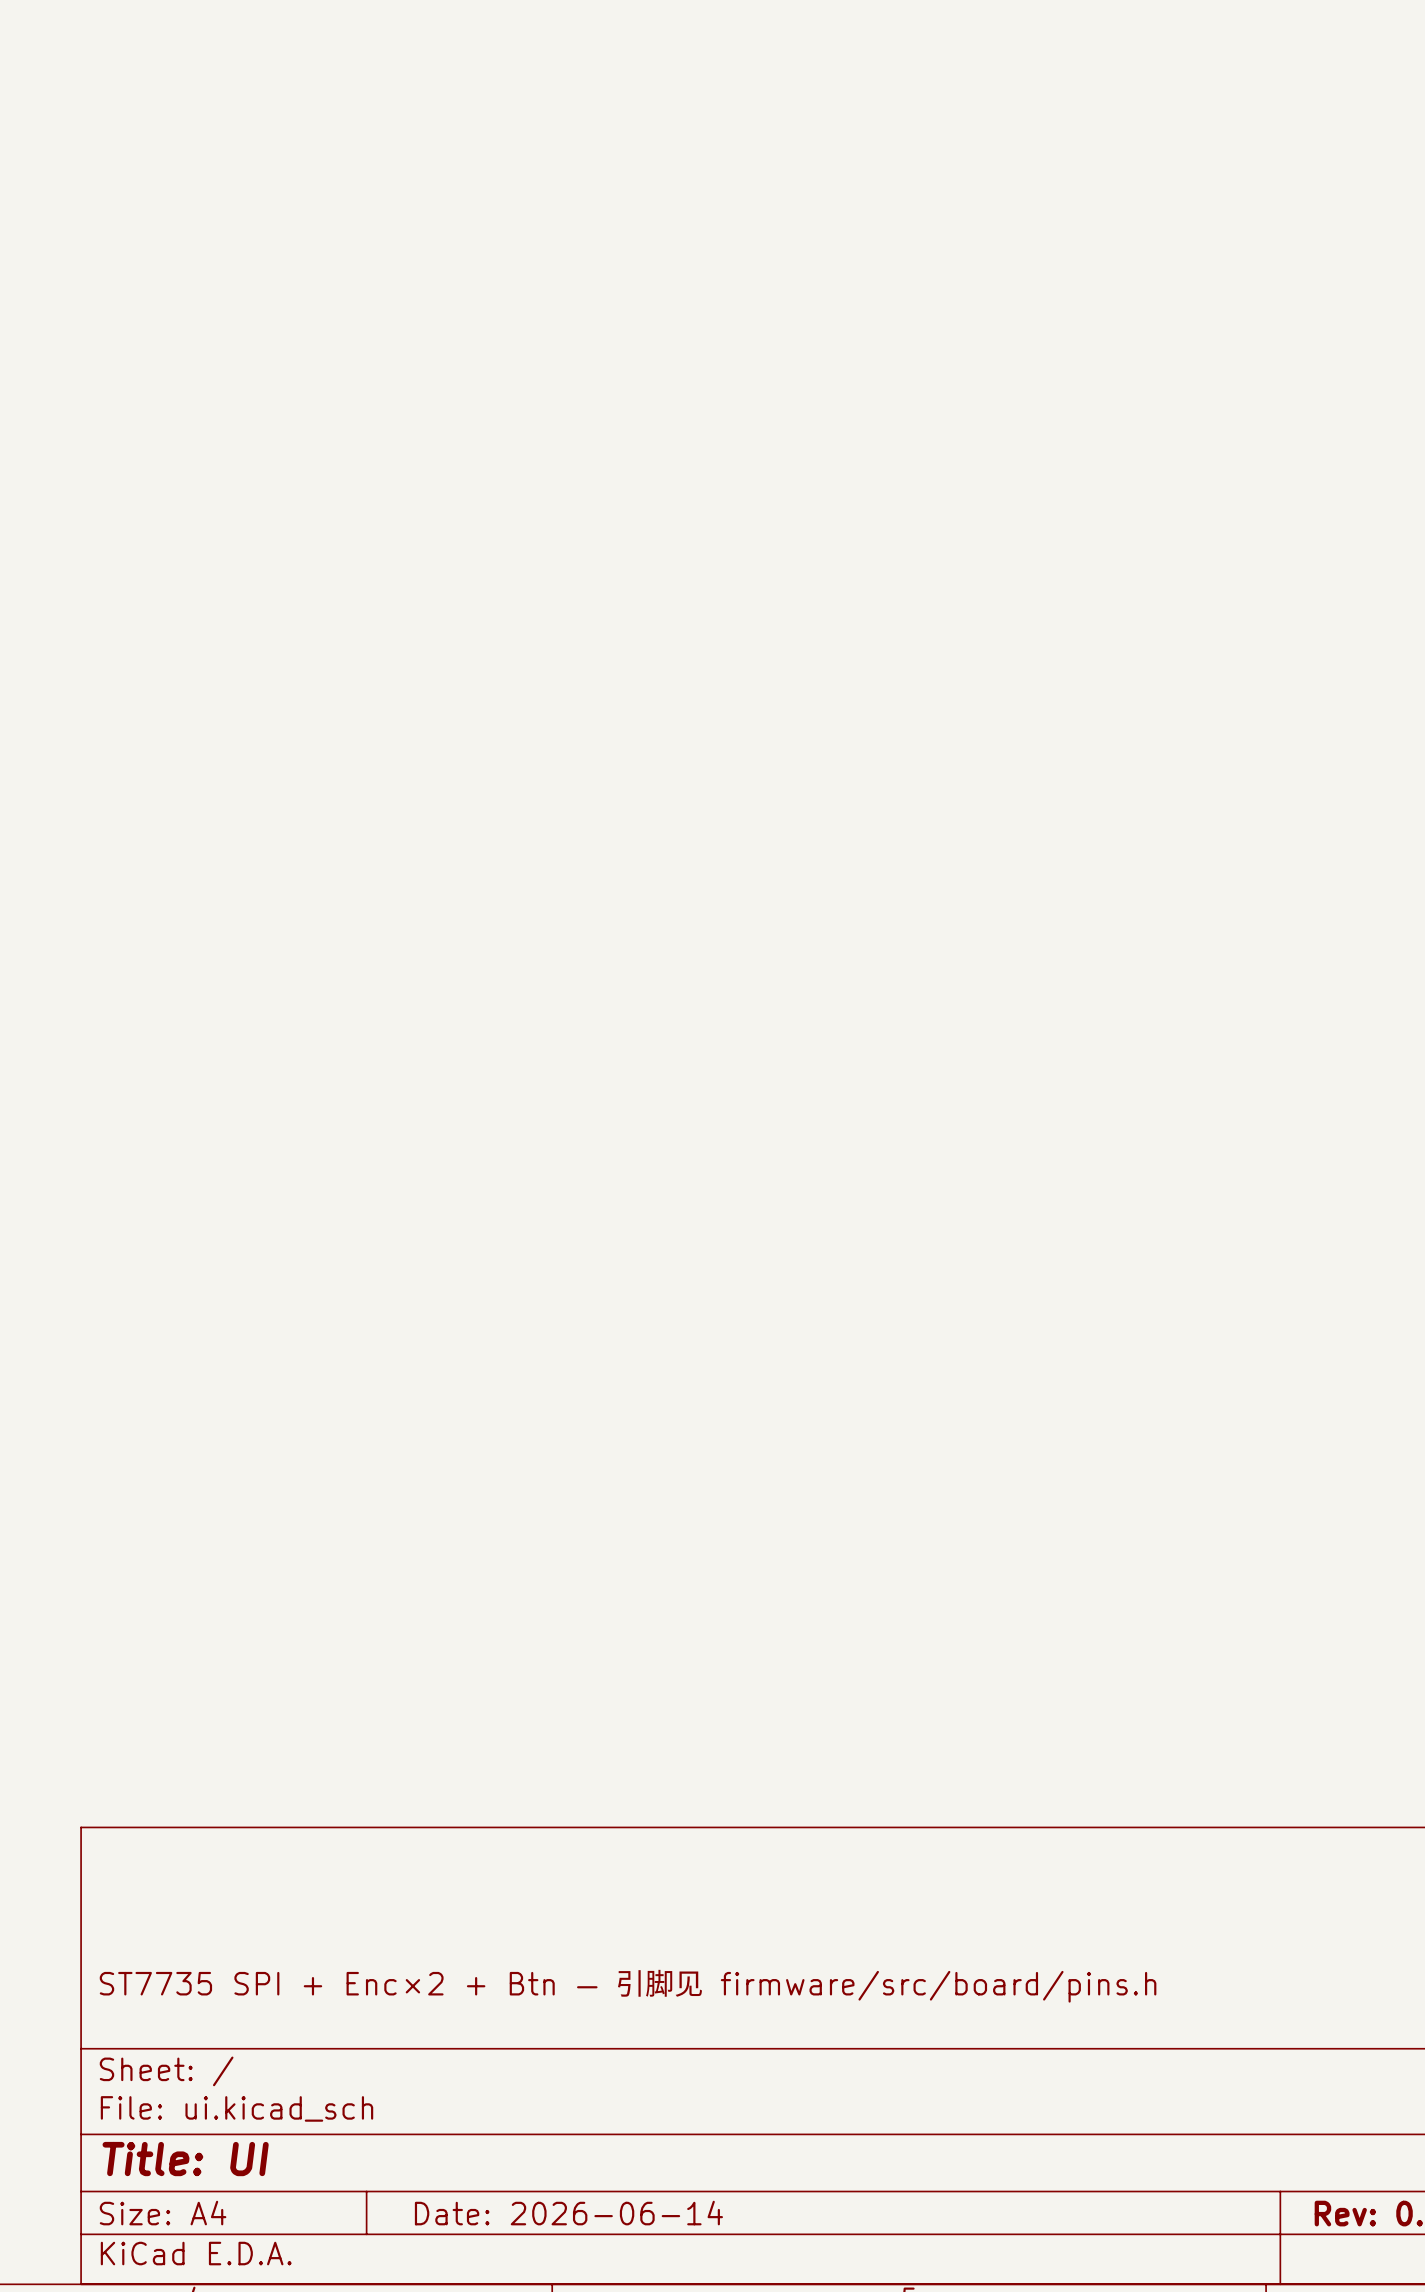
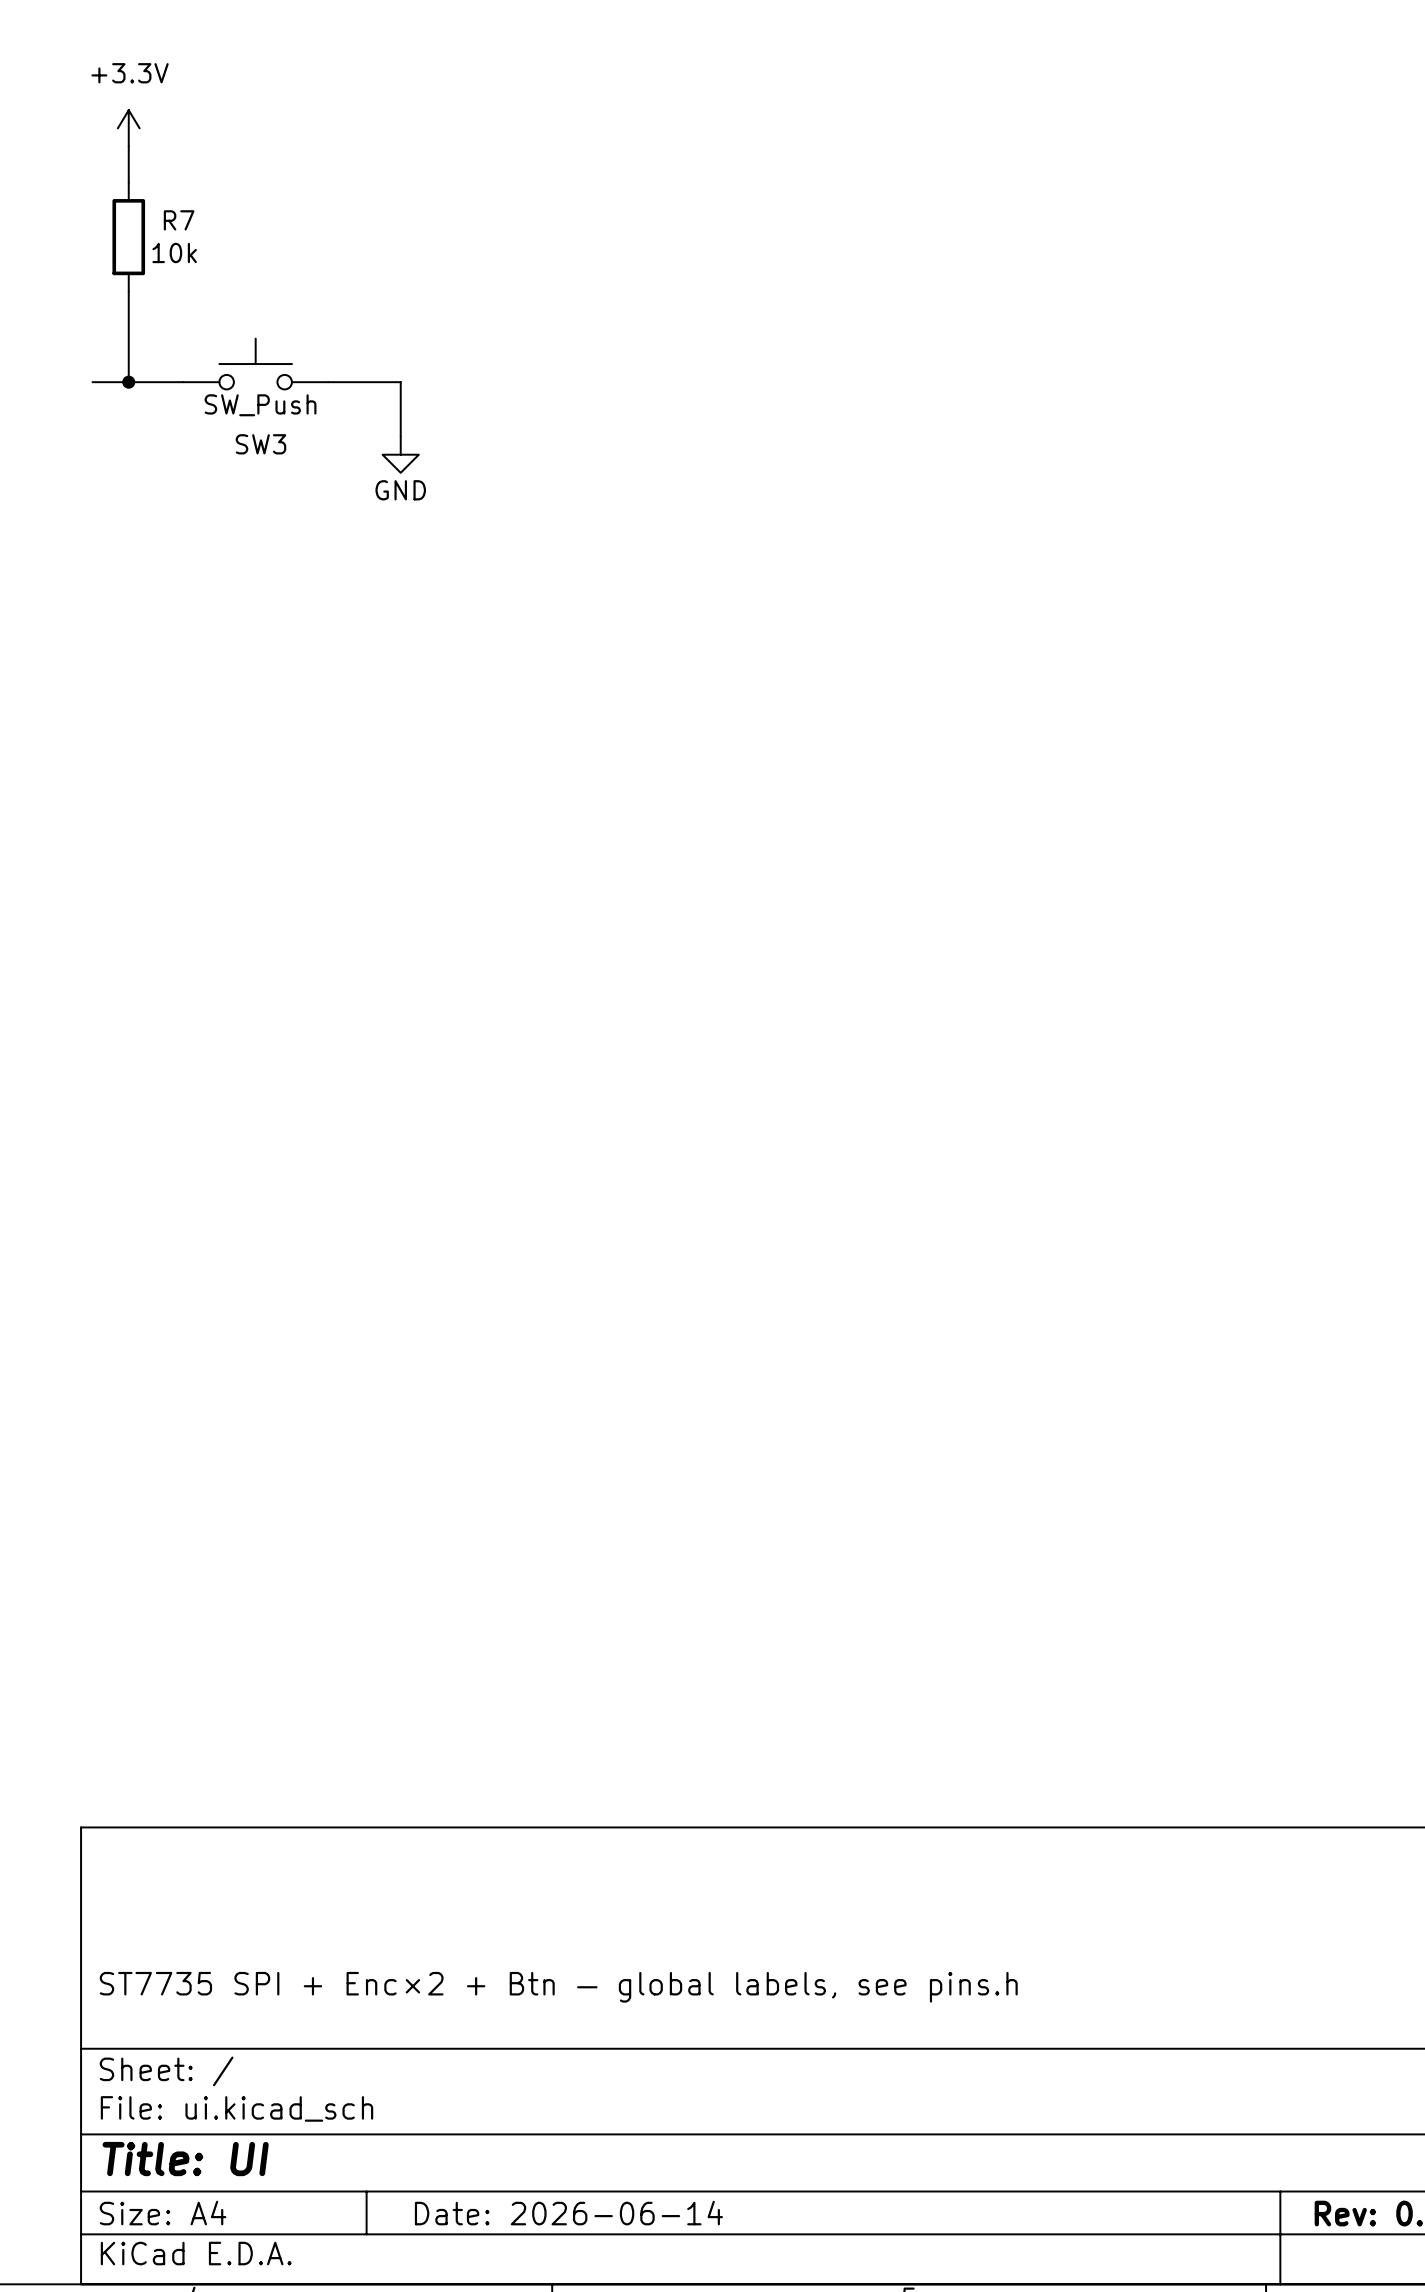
power symbol: none -> +3.3V (128, 128)
wire: none -> (128, 146) (128, 182)
R7: none -> 10k (128, 237)
wire: none -> (128, 291) (128, 382)
SW3: none -> SW_Push (255, 364)
wire: none -> (92, 382) (183, 382)
junction: none -> (128, 382)
wire: none -> (328, 382) (400, 382) (400, 436)
power symbol: none -> GND (400, 454)
title block: ST7735 SPI + Enc×2 + Btn — 引脚见 firmware/src/board/pins.h (628, 1985) -> ST7735 SPI + Enc×2 + Btn — global labels, see pins.h (558, 1987)

